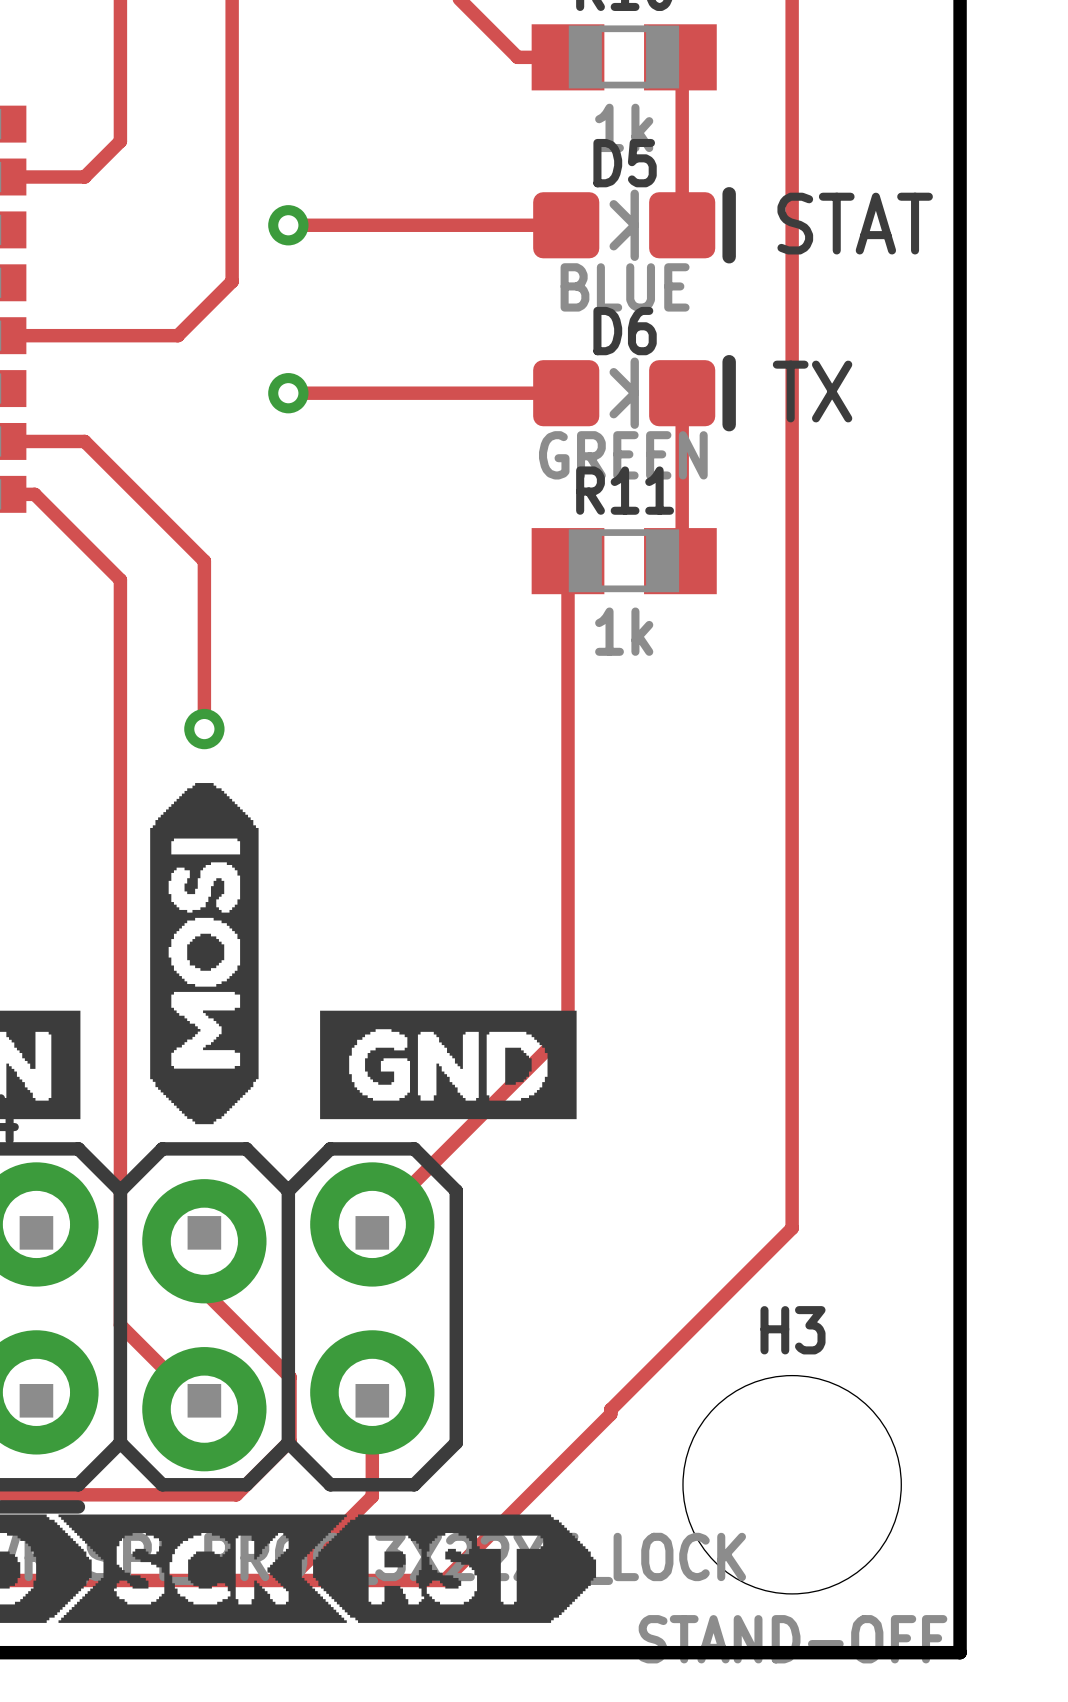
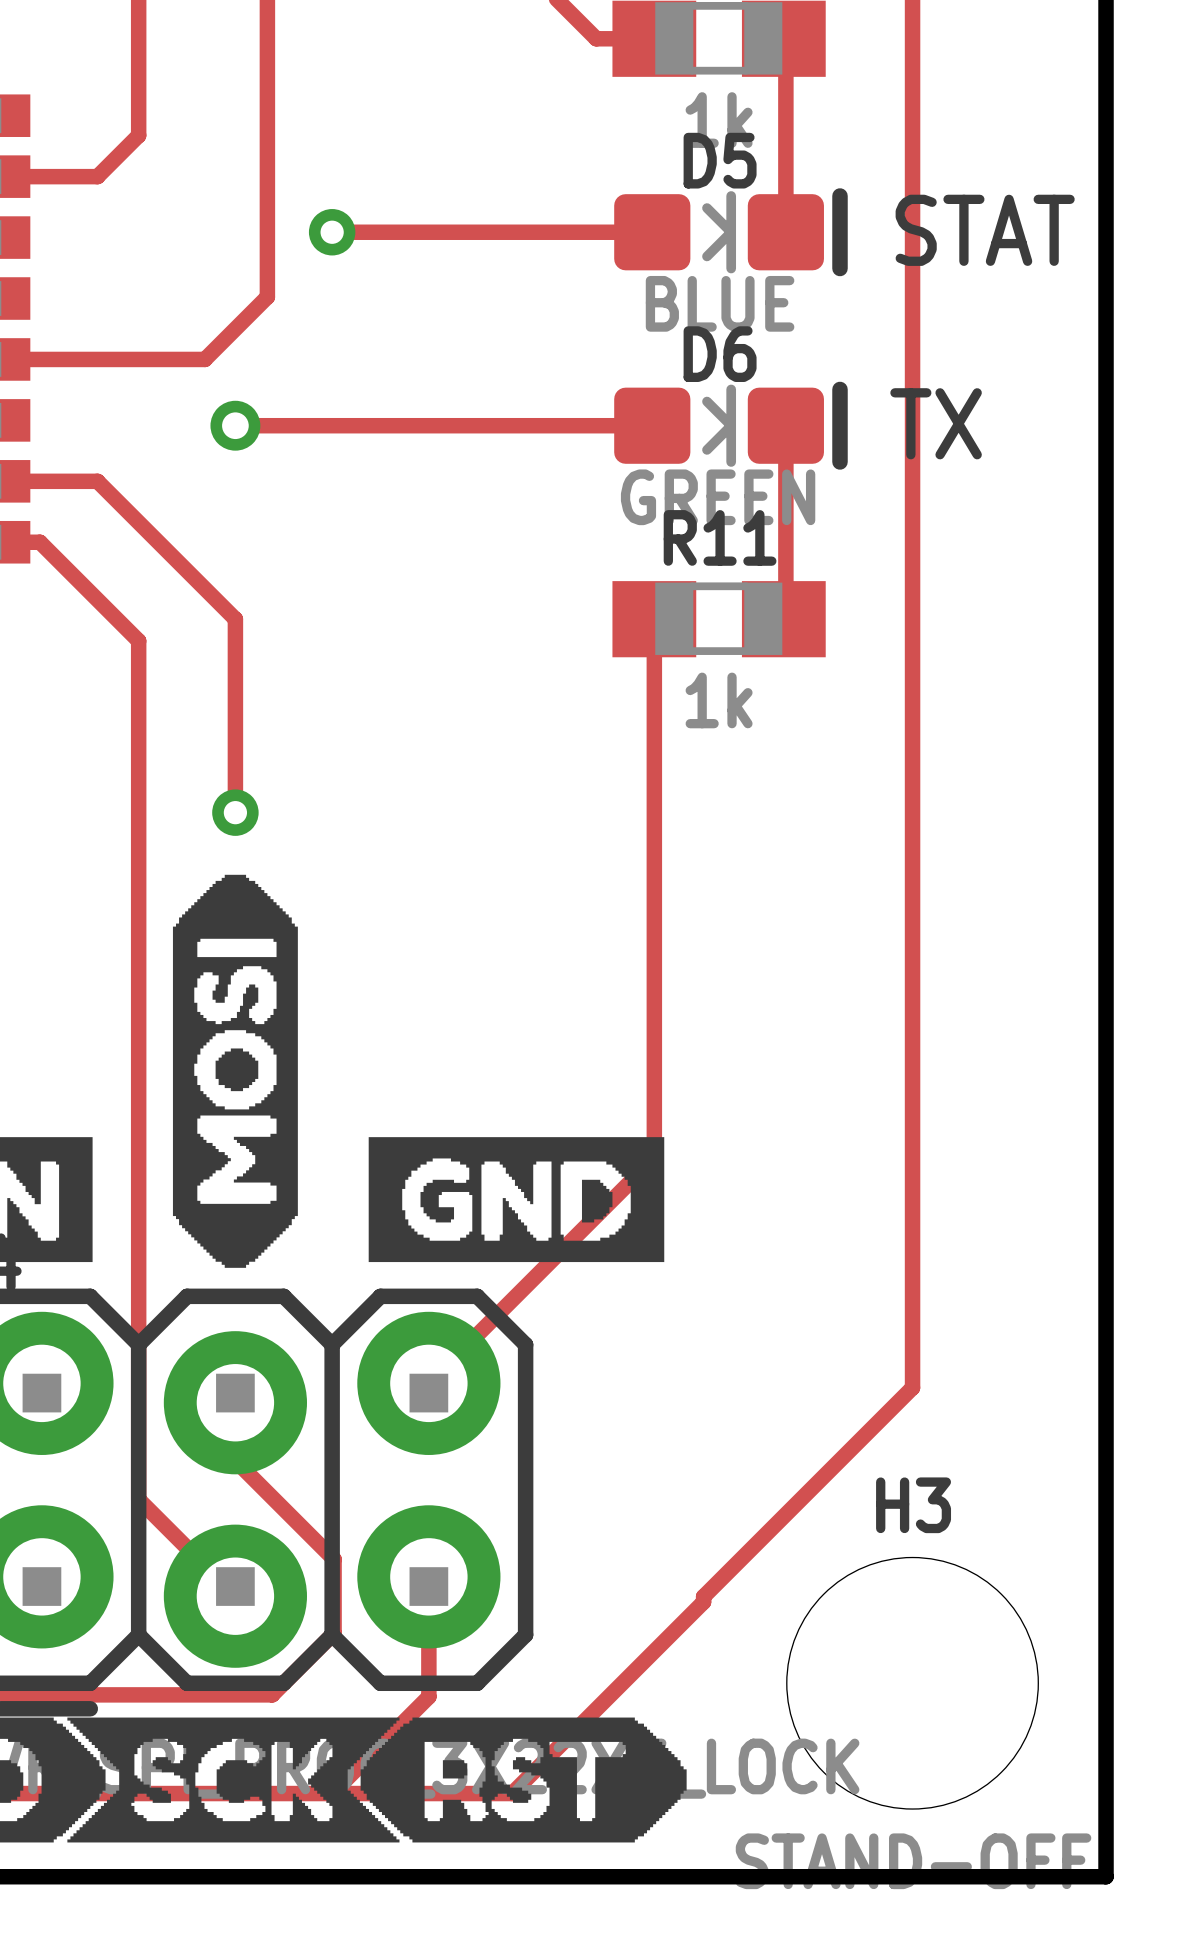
track: none -> (235, 425) (332, 425)
via: none -> (235, 425)
via: (288, 393) -> none

